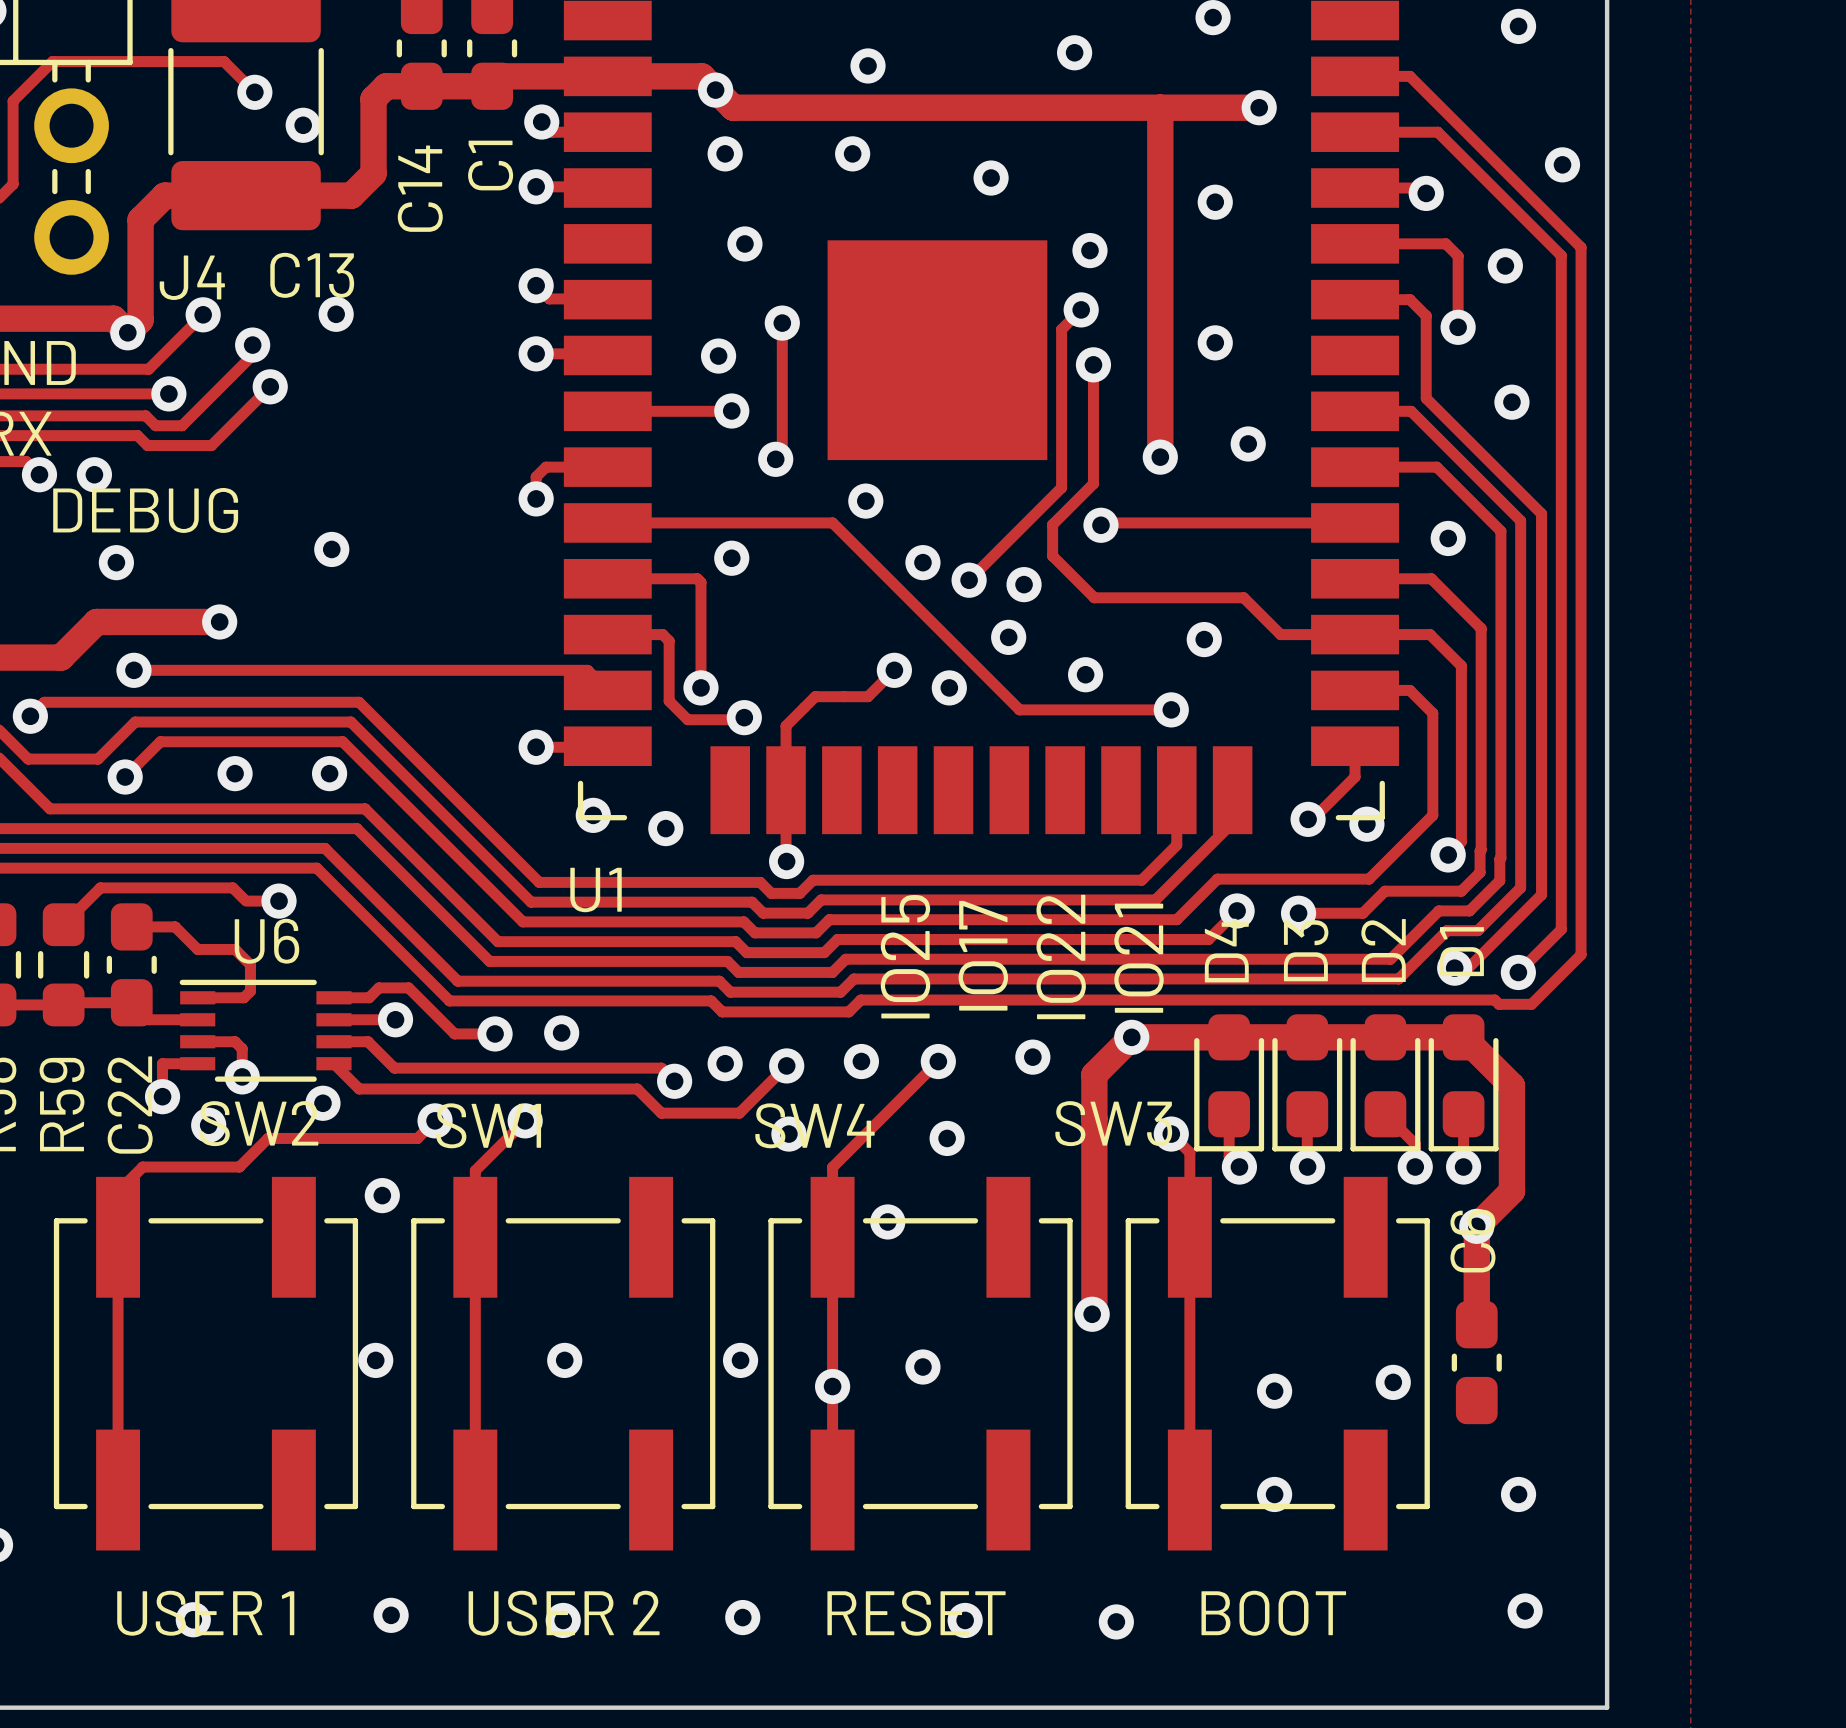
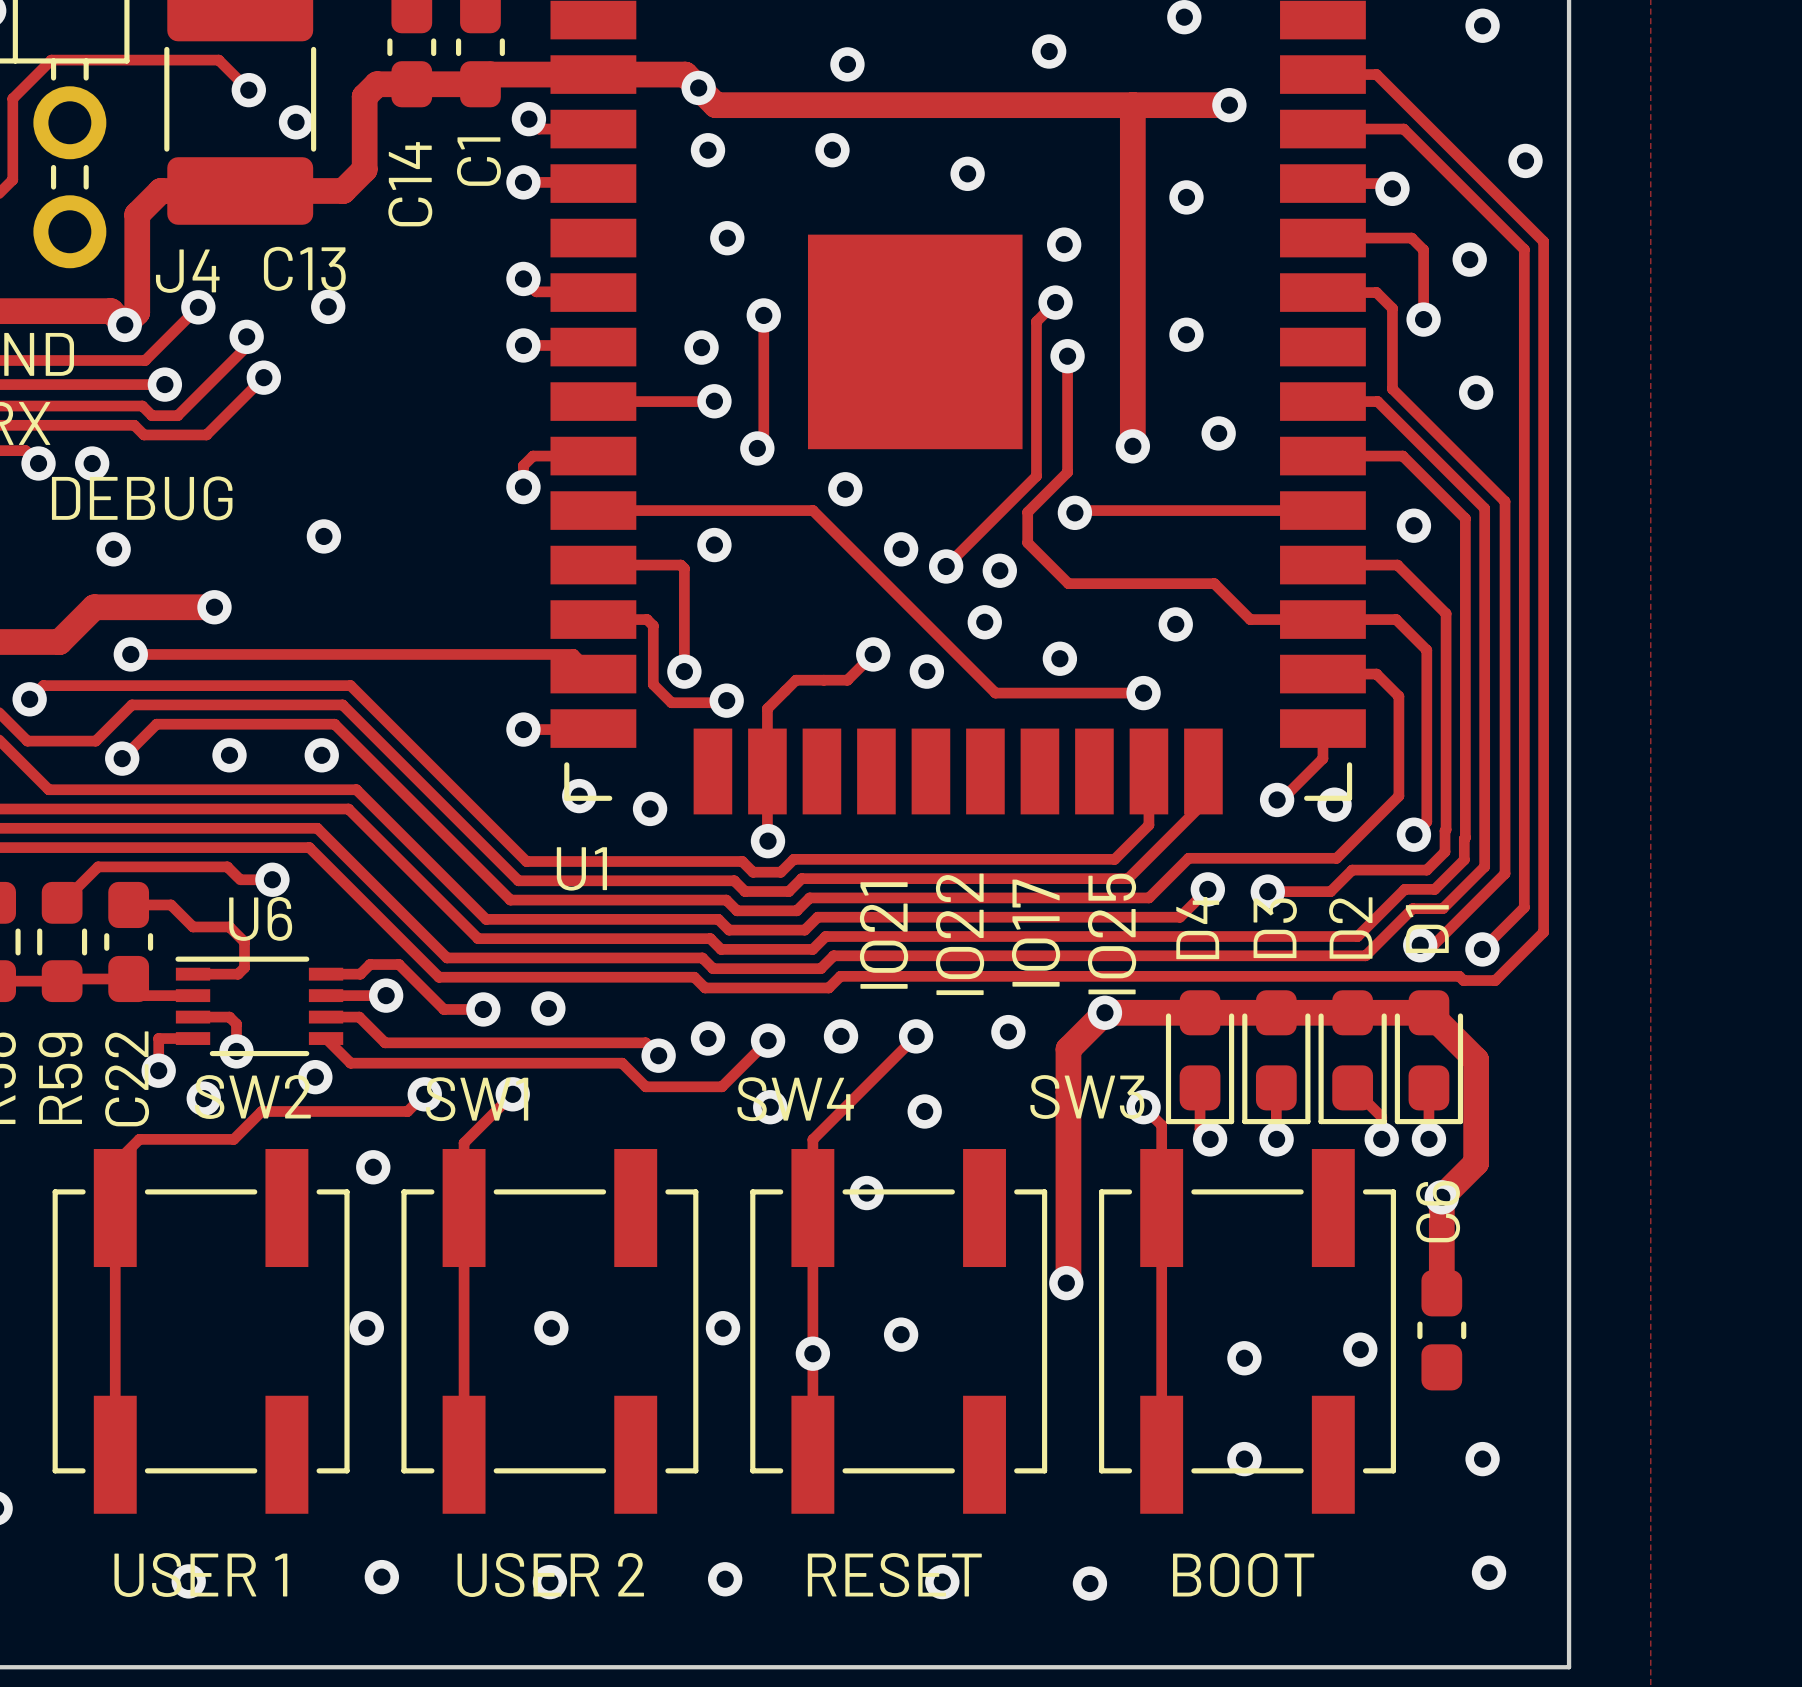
text: IO17 (983, 955) -> IO22 (960, 934)
text: IO25 (905, 956) -> IO21 (884, 935)
text: IO22 (1061, 956) -> IO17 (1036, 933)
text: IO21 (1139, 958) -> IO25 (1112, 934)

